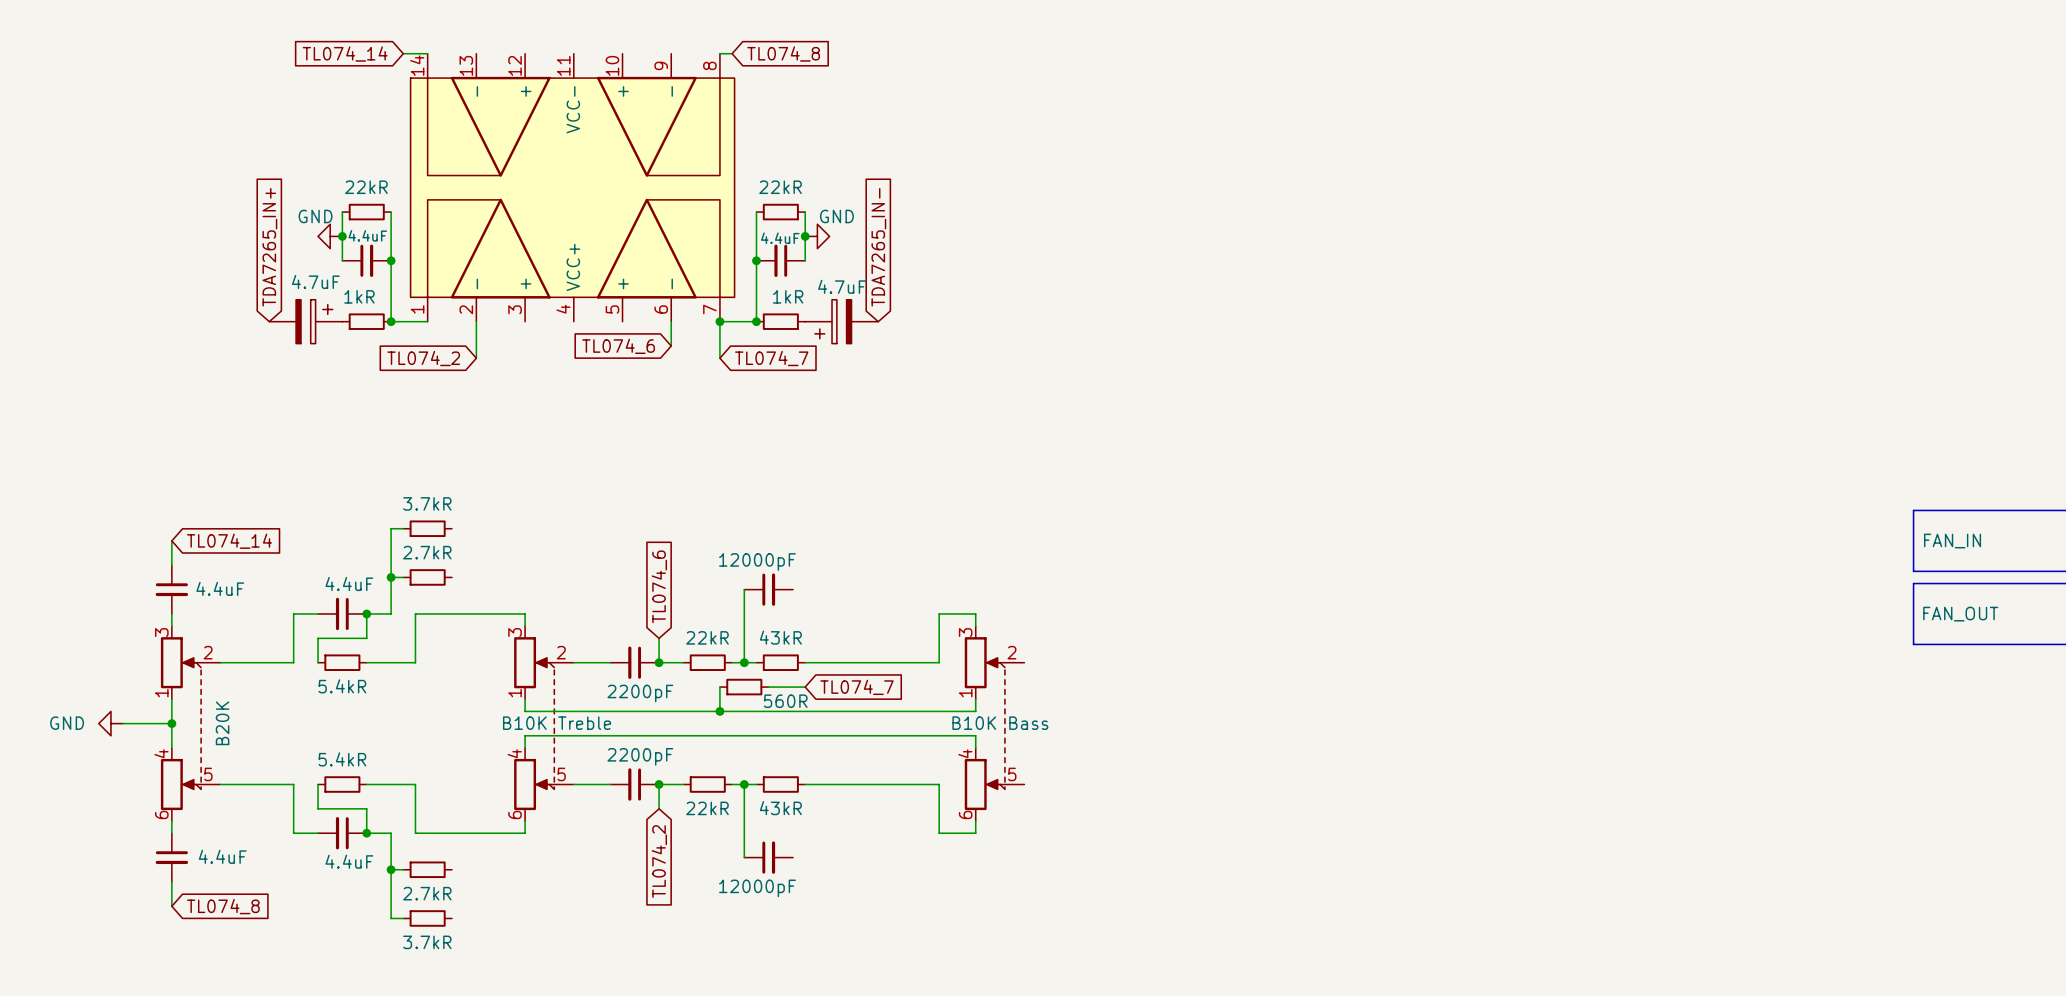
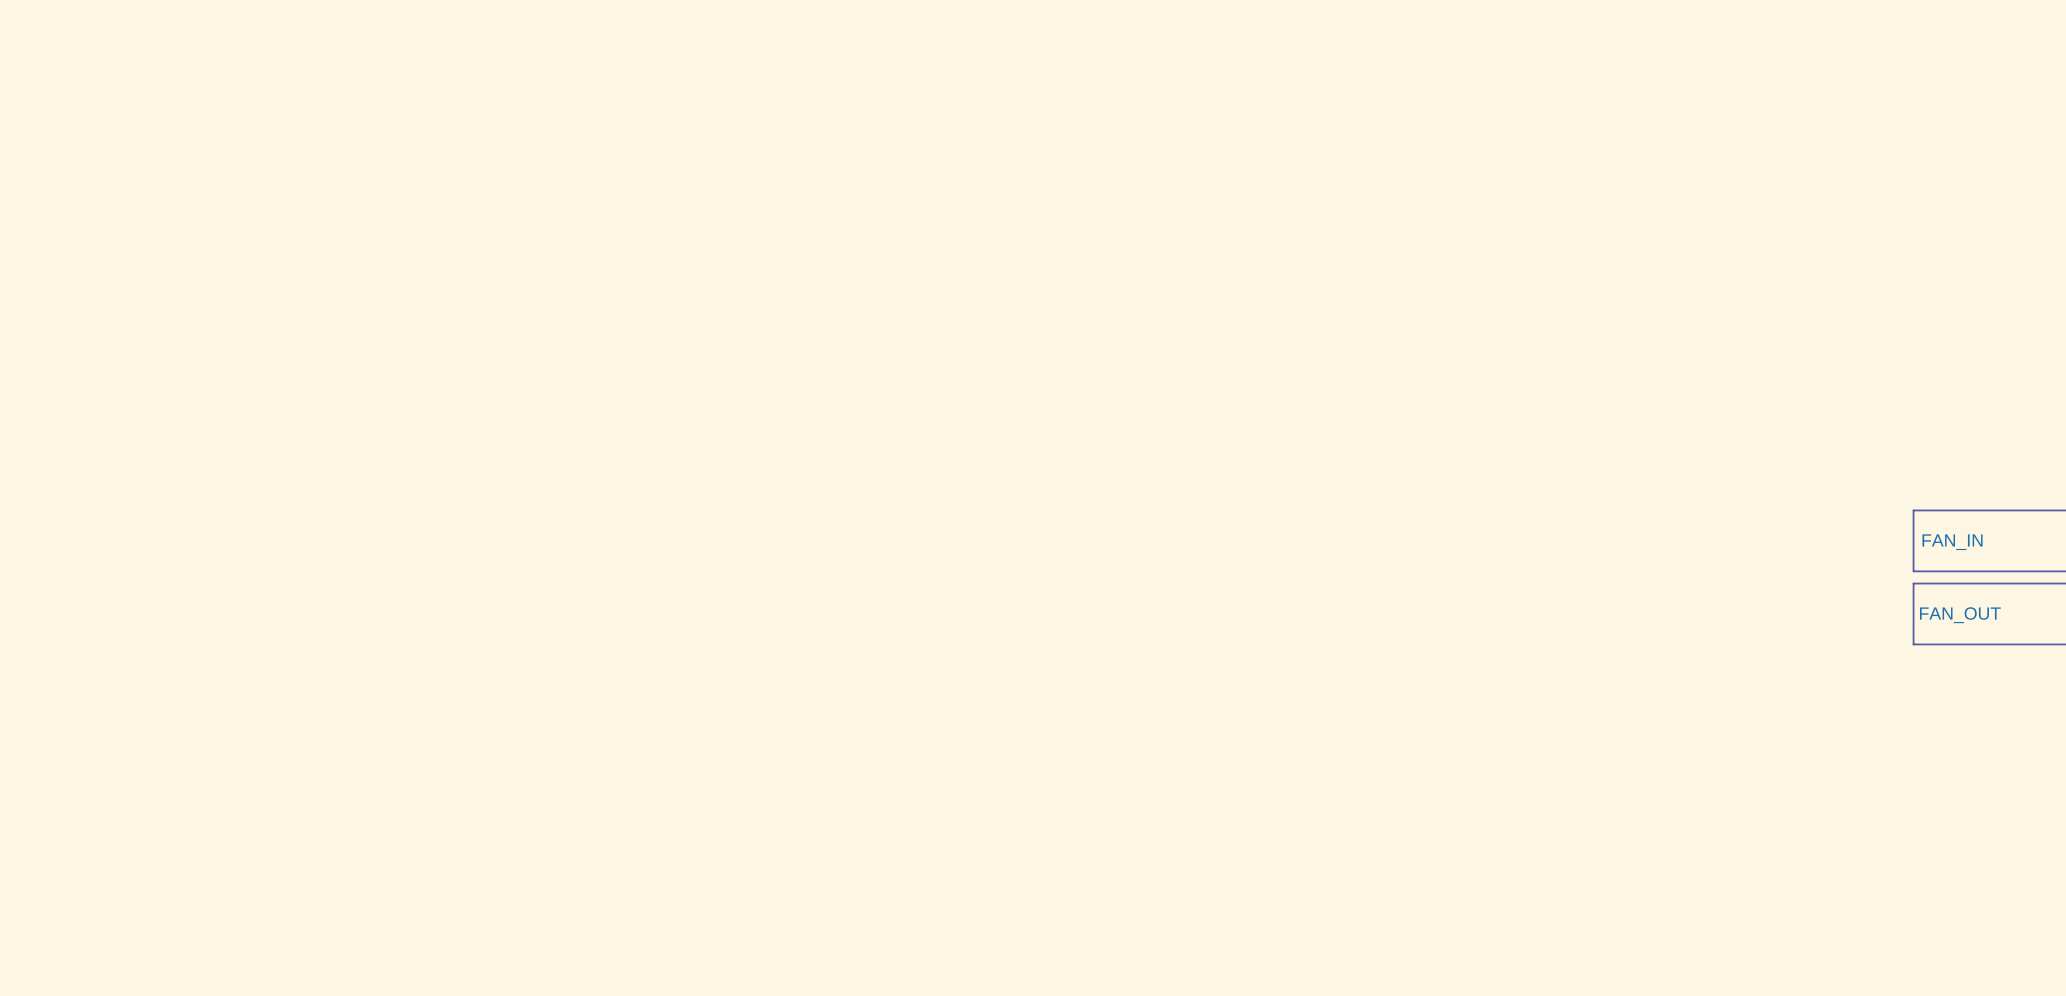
wire: (403, 53) (427, 53) -> none
wire: (719, 53) (732, 53) -> none
global label: TL074_14 (345, 54) -> none
global label: TL074_8 (783, 54) -> none
part: (572, 187) -> none
wire: (342, 212) (342, 260) -> none
part: 22kR (366, 212) -> none
wire: (391, 212) (391, 321) (427, 321) -> none
wire: (756, 212) (756, 321) (719, 321) (719, 358) -> none
part: 22kR (780, 212) -> none
wire: (805, 212) (805, 260) -> none
power symbol: GND (330, 236) -> none
junction: (342, 236) -> none
junction: (805, 236) -> none
power symbol: GND (817, 236) -> none
global label: TDA7265_IN+ (269, 247) -> none
global label: TDA7265_IN- (878, 247) -> none
part: 4.4uF (366, 260) -> none
junction: (391, 260) -> none
junction: (756, 260) -> none
part: 4.4uF (780, 260) -> none
part: 4.7uF (305, 321) -> none
part: 1kR (366, 321) -> none
junction: (391, 321) -> none
wire: (476, 321) (476, 358) -> none
wire: (671, 321) (671, 346) -> none
junction: (719, 321) -> none
junction: (756, 321) -> none
part: 1kR (780, 321) -> none
part: 4.7uF (841, 321) -> none
global label: TL074_6 (618, 346) -> none
global label: TL074_2 (423, 358) -> none
global label: TL074_7 (771, 358) -> none
wire: (403, 528) (391, 528) (391, 613) (366, 613) (366, 638) (318, 638) (318, 662) -> none
part: 3.7kR (427, 528) -> none
wire: (171, 540) (171, 565) -> none
global label: TL074_14 (229, 541) -> none
wire: (391, 577) (403, 577) -> none
junction: (391, 577) -> none
part: 2.7kR (427, 577) -> none
global label: TL074_6 (659, 586) -> none
part: 4.4uF (171, 589) -> none
wire: (744, 589) (744, 662) -> none
part: 12000pF (768, 589) -> none
wire: (171, 613) (171, 626) -> none
wire: (318, 613) (293, 613) (293, 662) (220, 662) -> none
part: 4.4uF (342, 613) -> none
junction: (366, 613) -> none
wire: (525, 626) (525, 613) (415, 613) (415, 662) (366, 662) -> none
wire: (975, 626) (975, 613) (939, 613) (939, 662) (805, 662) -> none
wire: (659, 638) (659, 662) (683, 662) -> none
part: 5.4kR (342, 662) -> none
wire: (573, 662) (610, 662) -> none
part: 2200pF (634, 662) -> none
junction: (659, 662) -> none
part: 22kR (707, 662) -> none
wire: (732, 662) (756, 662) -> none
junction: (744, 662) -> none
part: 43kR (780, 662) -> none
wire: (719, 687) (719, 711) -> none
part: 560R (744, 687) -> none
wire: (768, 687) (805, 687) -> none
global label: TL074_7 (856, 687) -> none
wire: (171, 699) (171, 747) -> none
wire: (525, 699) (525, 711) (975, 711) (975, 699) -> none
junction: (719, 711) -> none
power symbol: GND (110, 723) -> none
wire: (123, 723) (171, 723) -> none
junction: (171, 723) -> none
part: B20K (190, 723) -> none
part: B10K Treble (543, 723) -> none
part: B10K Bass (994, 723) -> none
wire: (525, 747) (525, 735) (975, 735) (975, 747) -> none
wire: (220, 784) (293, 784) (293, 833) (318, 833) -> none
wire: (318, 784) (318, 808) (366, 808) (366, 833) (391, 833) (391, 918) (403, 918) -> none
part: 5.4kR (342, 784) -> none
wire: (366, 784) (415, 784) (415, 833) (525, 833) (525, 821) -> none
wire: (573, 784) (610, 784) -> none
part: 2200pF (634, 784) -> none
junction: (659, 784) -> none
wire: (683, 784) (659, 784) (659, 808) -> none
part: 22kR (707, 784) -> none
wire: (732, 784) (756, 784) -> none
wire: (744, 784) (744, 857) -> none
junction: (744, 784) -> none
part: 43kR (780, 784) -> none
wire: (805, 784) (939, 784) (939, 833) (975, 833) (975, 821) -> none
wire: (171, 821) (171, 833) -> none
part: 4.4uF (342, 833) -> none
junction: (366, 833) -> none
part: 4.4uF (171, 857) -> none
part: 12000pF (768, 857) -> none
global label: TL074_2 (659, 861) -> none
wire: (391, 869) (403, 869) -> none
junction: (391, 869) -> none
part: 2.7kR (427, 869) -> none
wire: (171, 881) (171, 906) -> none
global label: TL074_8 (223, 906) -> none
part: 3.7kR (427, 918) -> none

